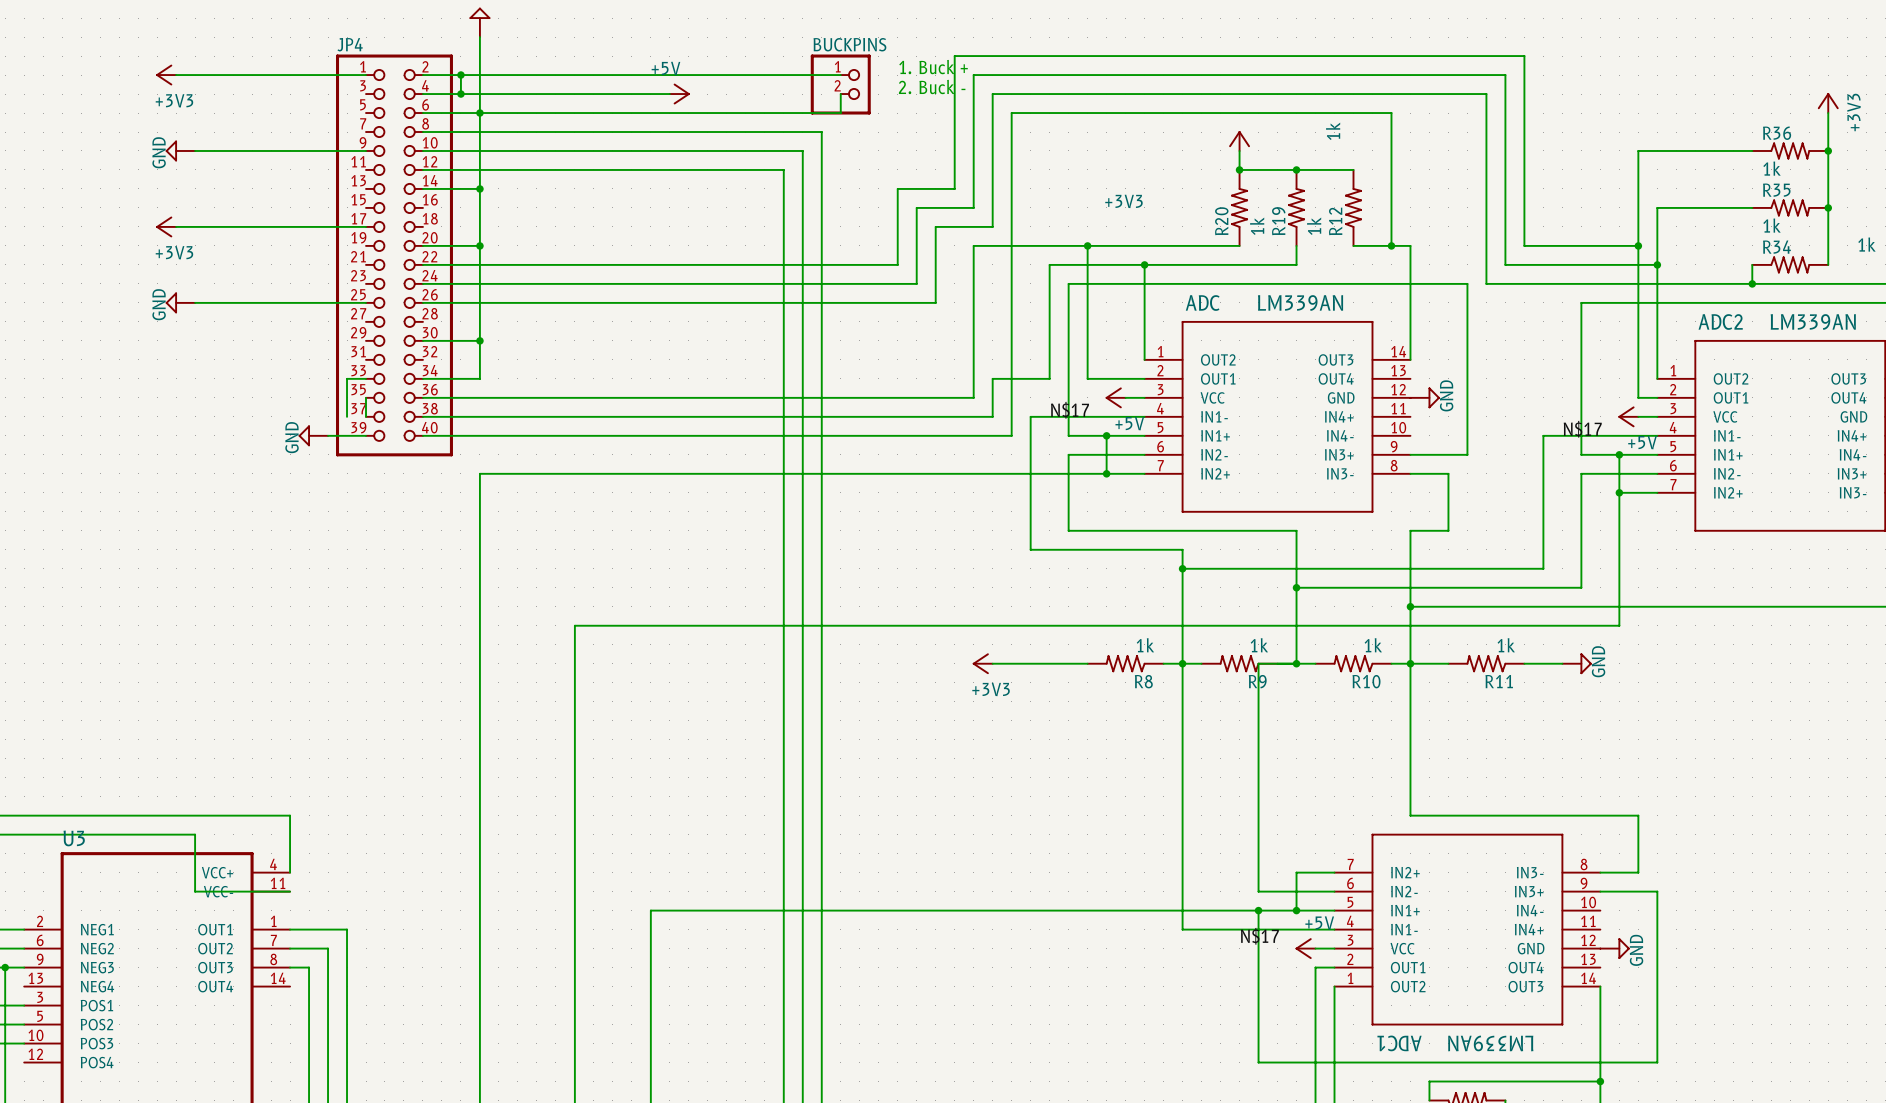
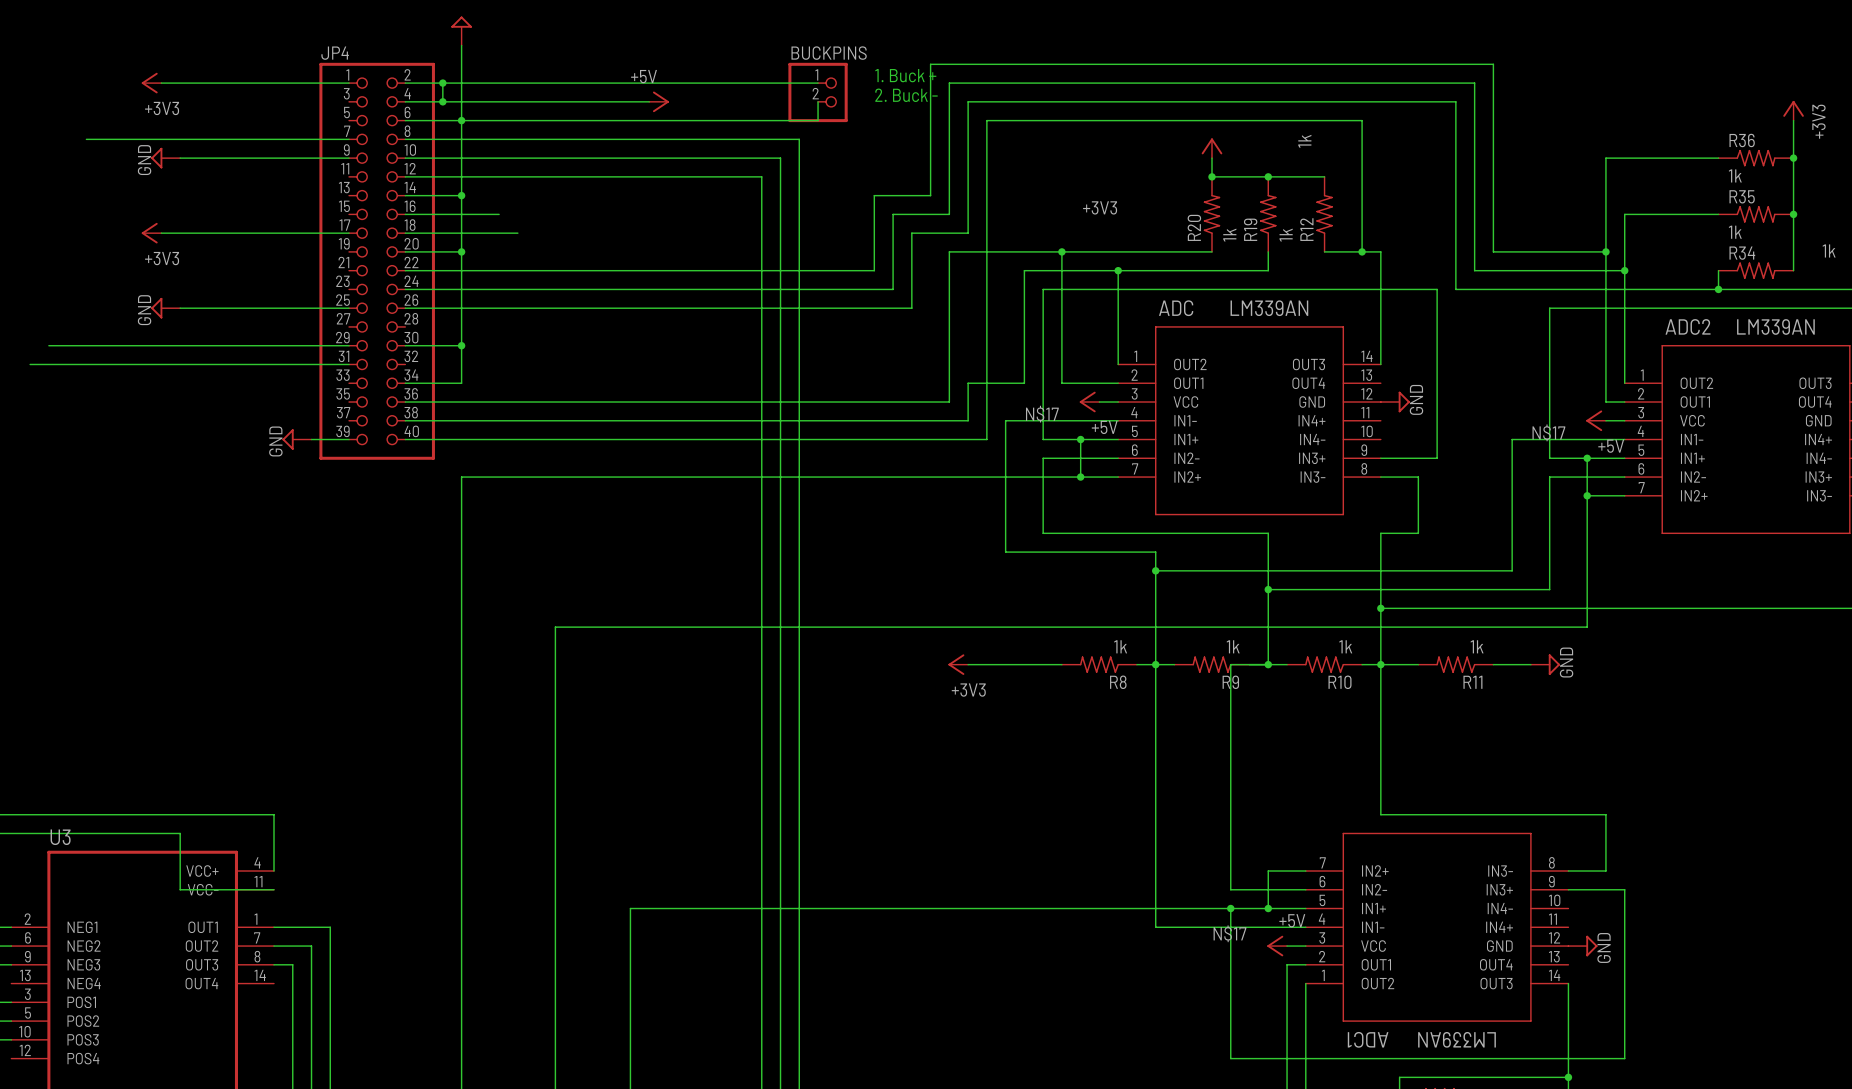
wire: none -> (86, 139) (349, 139)
wire: none -> (405, 214) (499, 214)
wire: none -> (405, 233) (517, 233)
wire: none -> (48, 345) (349, 345)
wire: none -> (30, 364) (349, 364)
wire: (366, 378) (347, 378) (347, 416) -> none
wire: (366, 397) (366, 416) -> none

